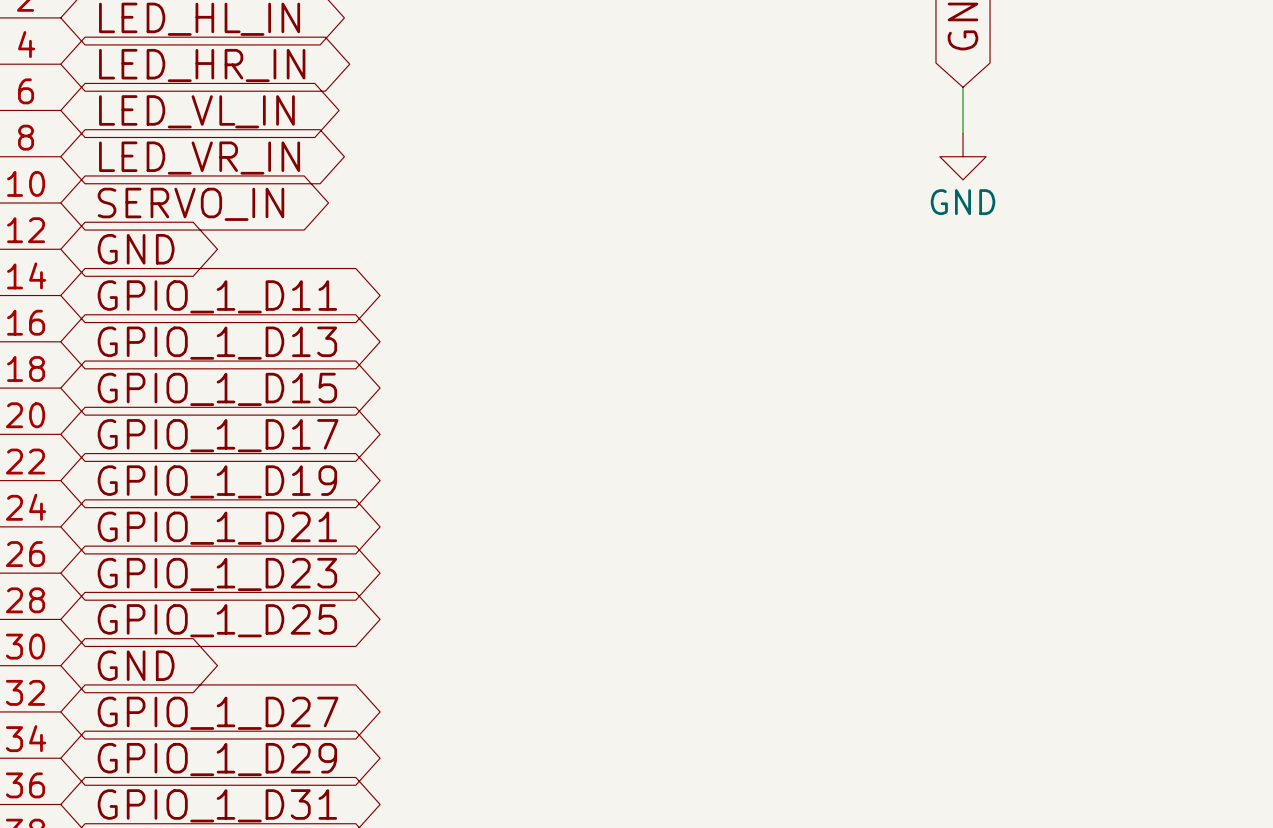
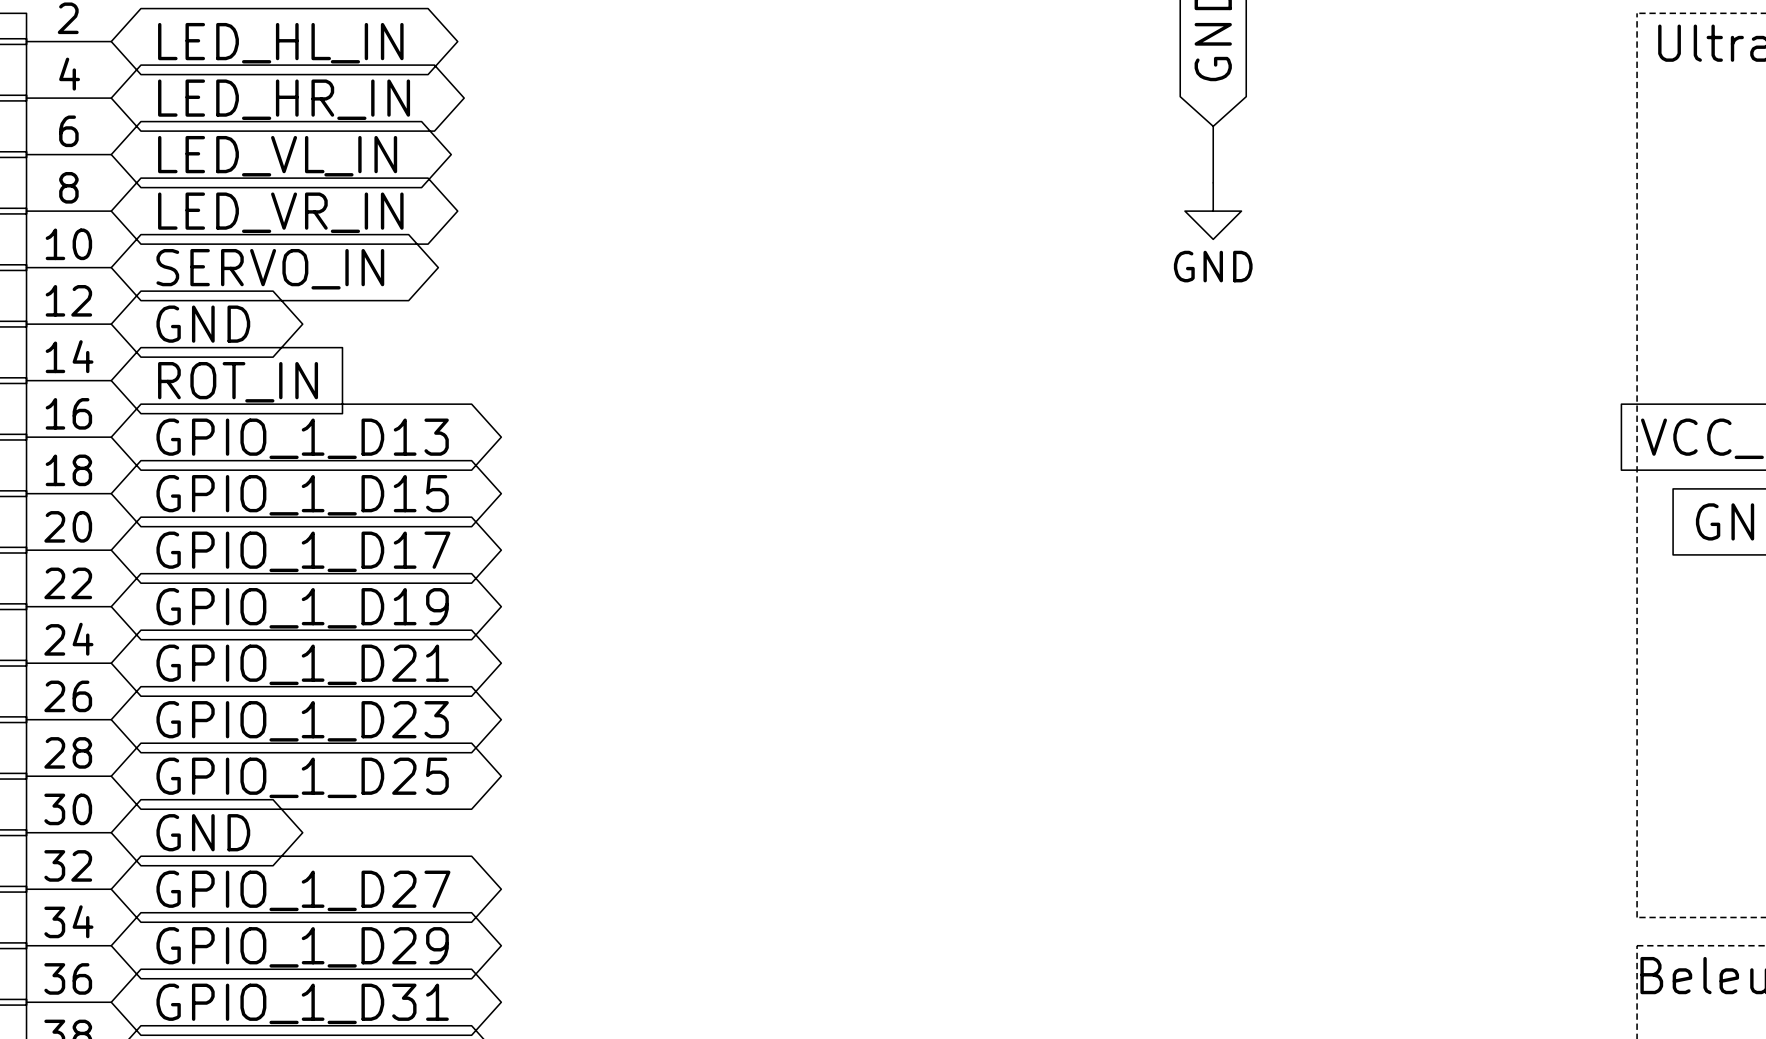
global label shape: bidirectional (217, 296) -> input (238, 382)
global label: GPIO_1_D11 (217, 296) -> ROT_IN (238, 382)

